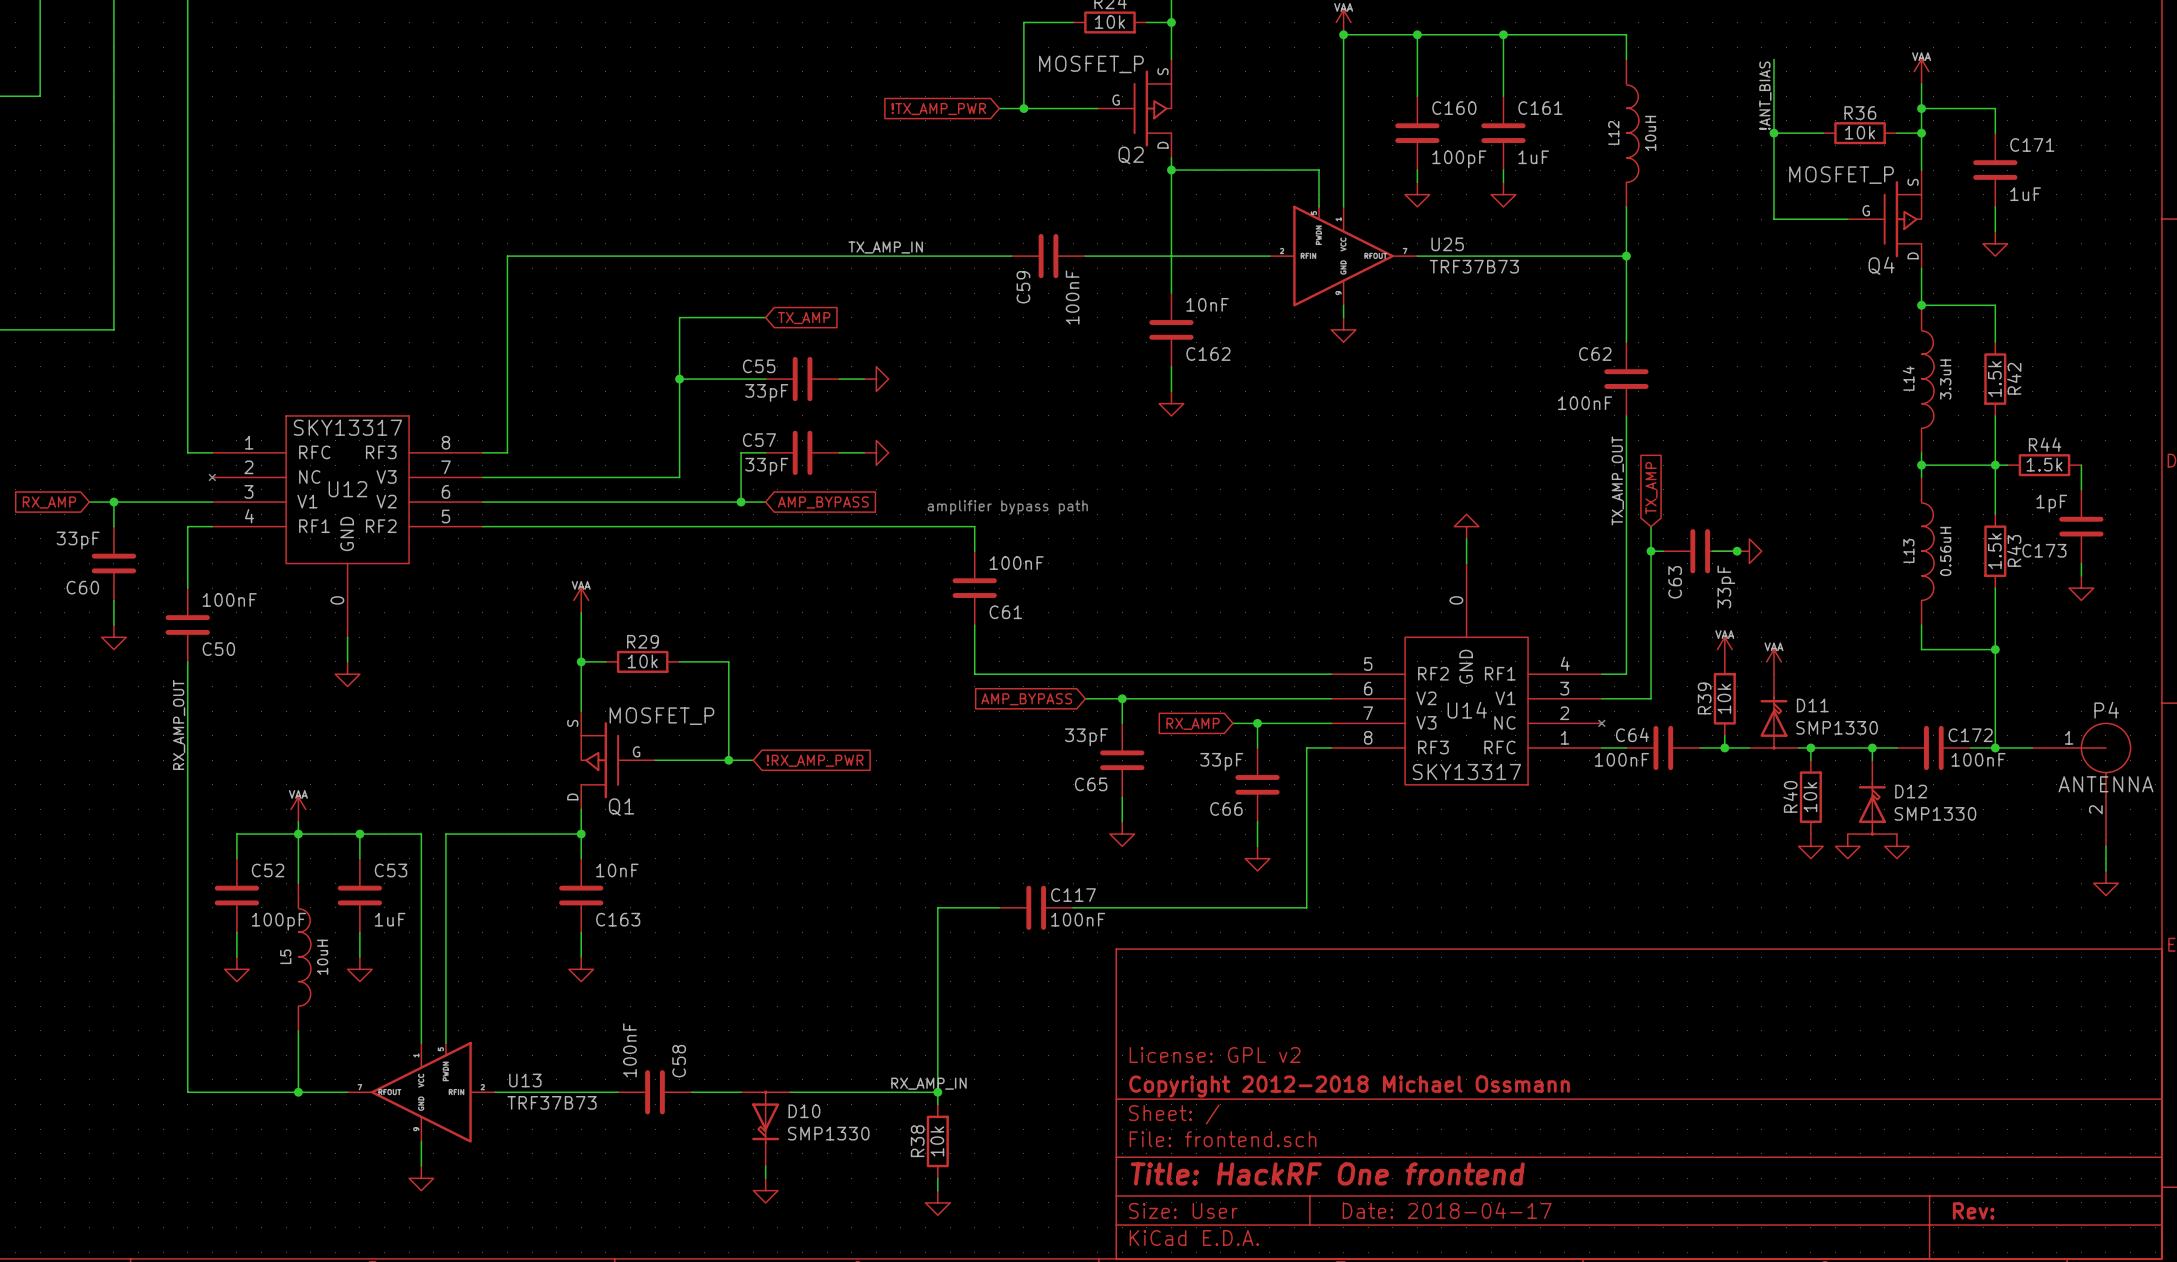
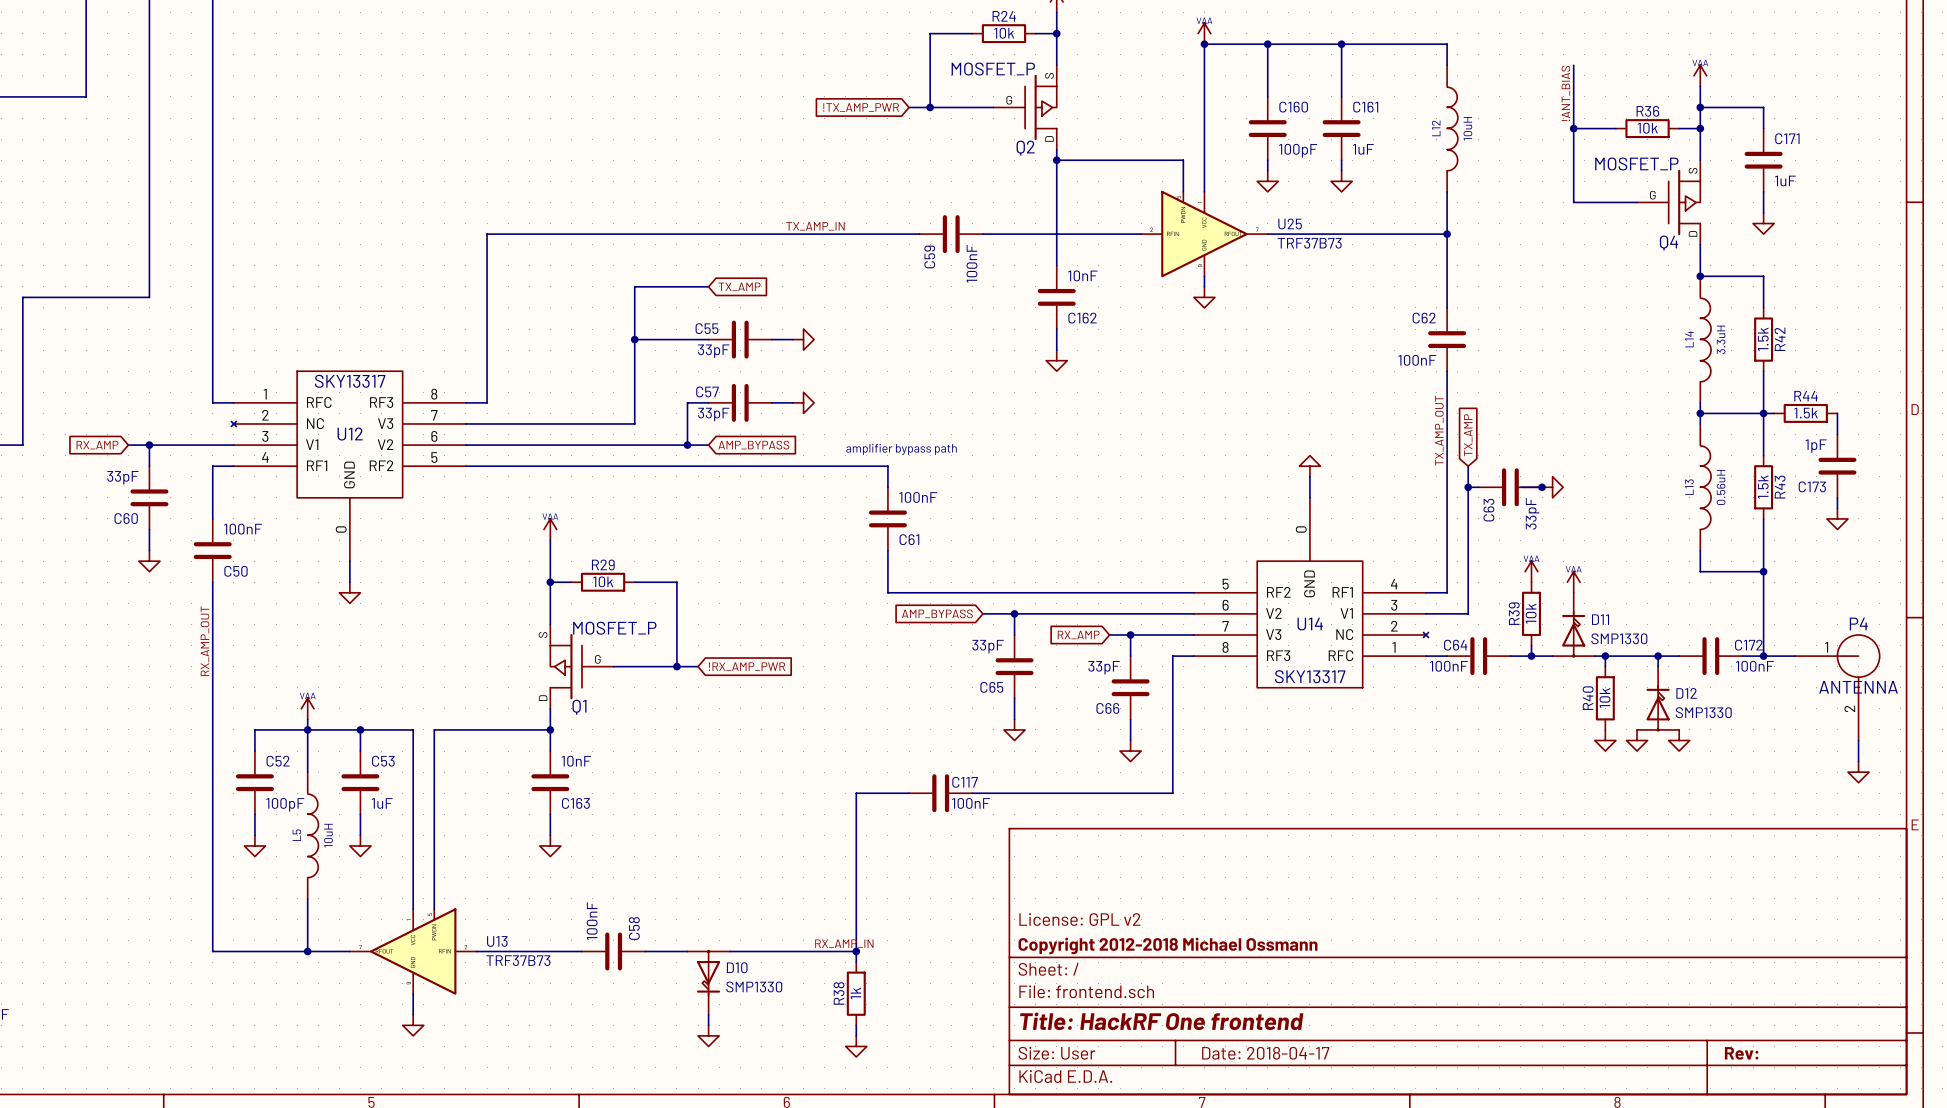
R38 value: 10k (937, 1141) -> 1k (855, 993)

